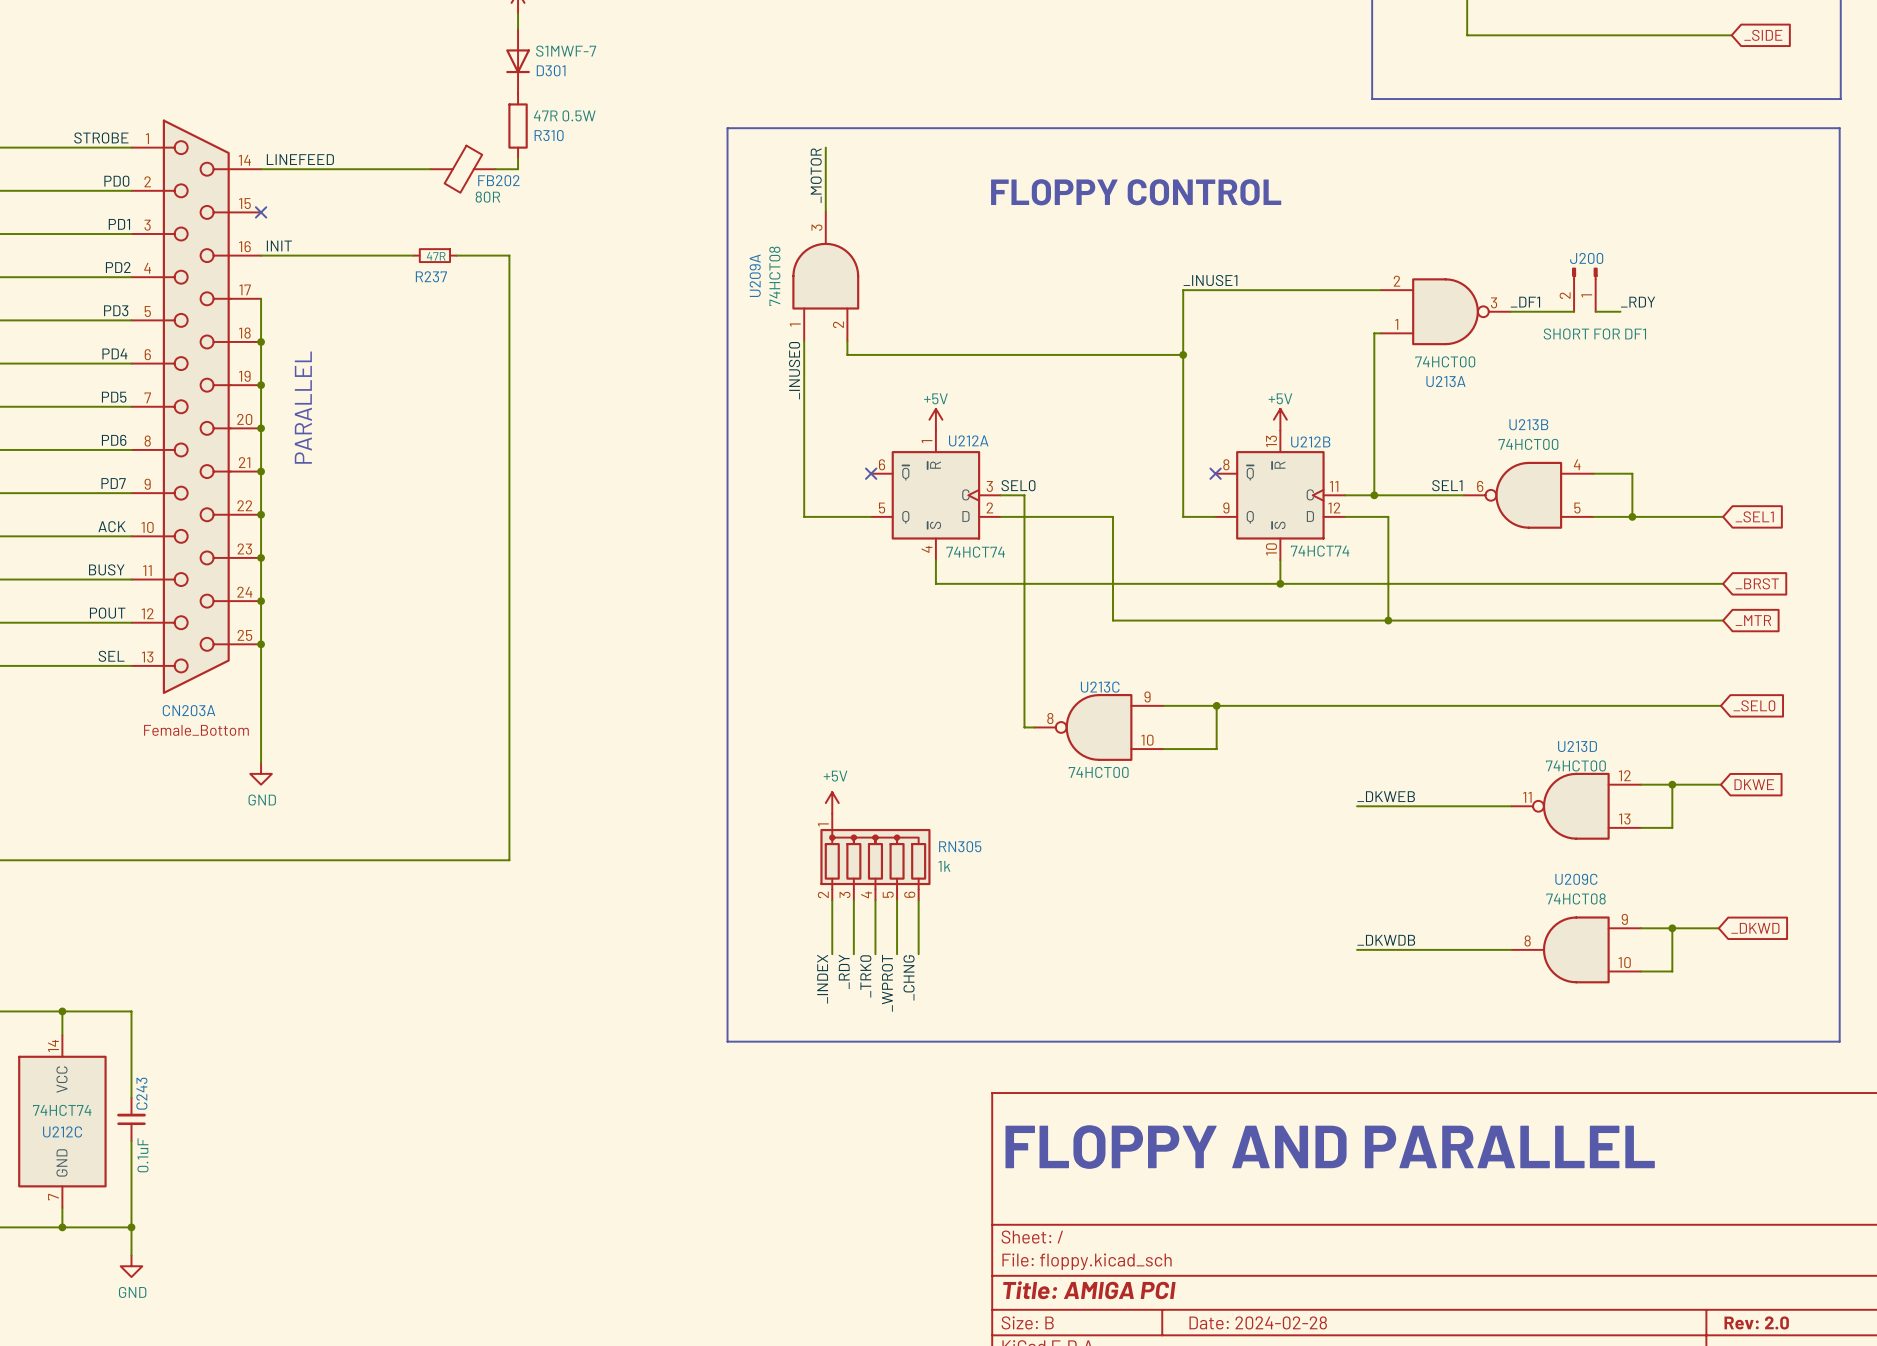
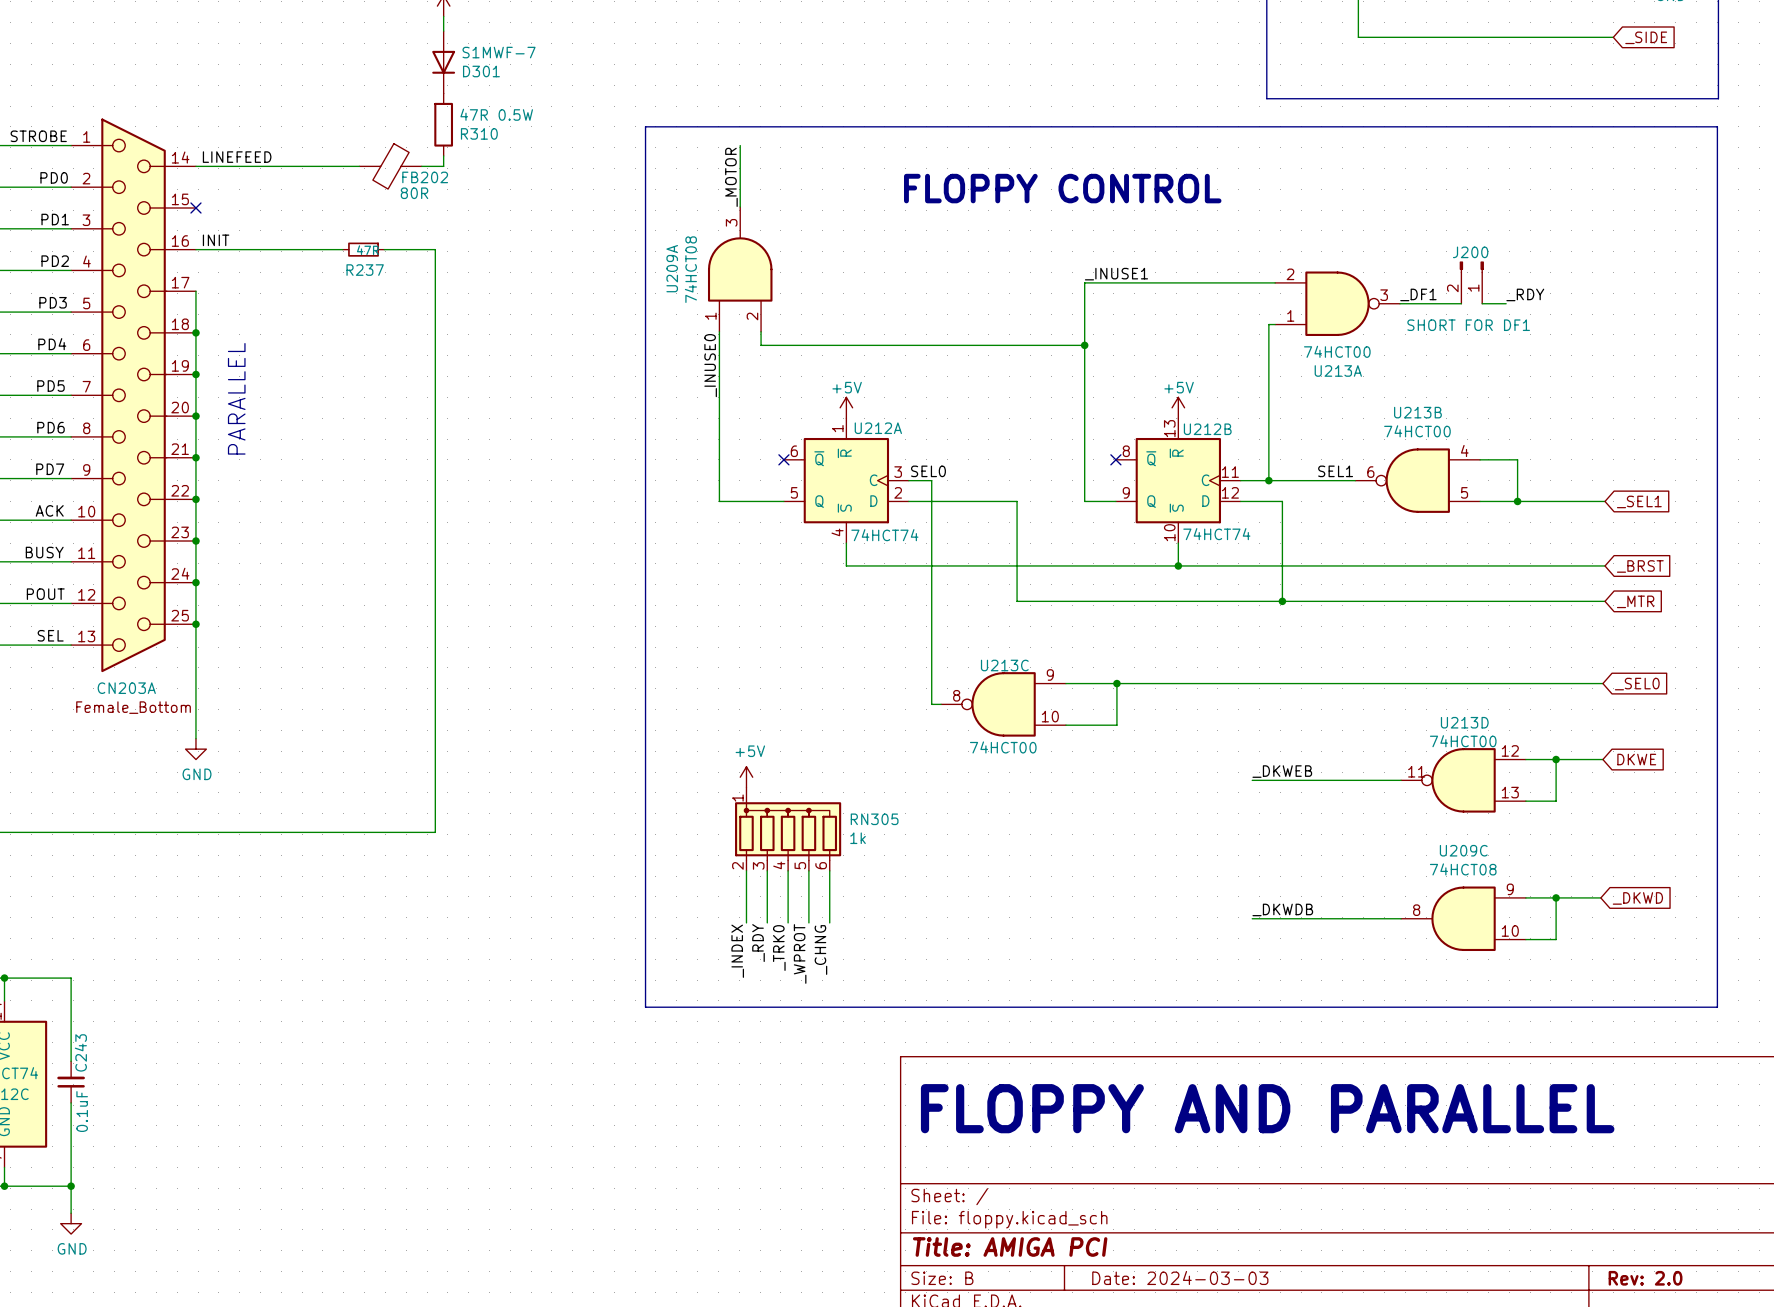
title block: Date: 2024-02-28 (1258, 1322) -> Date: 2024-03-03 (1180, 1277)

